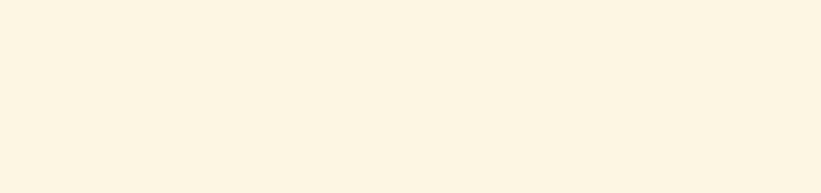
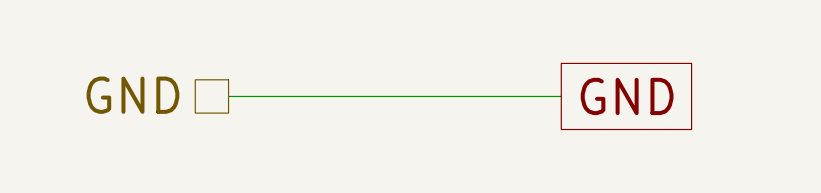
hierarchical label: none -> GND (132, 95)
wire: none -> (228, 96) (561, 96)
global label: none -> GND (627, 96)

